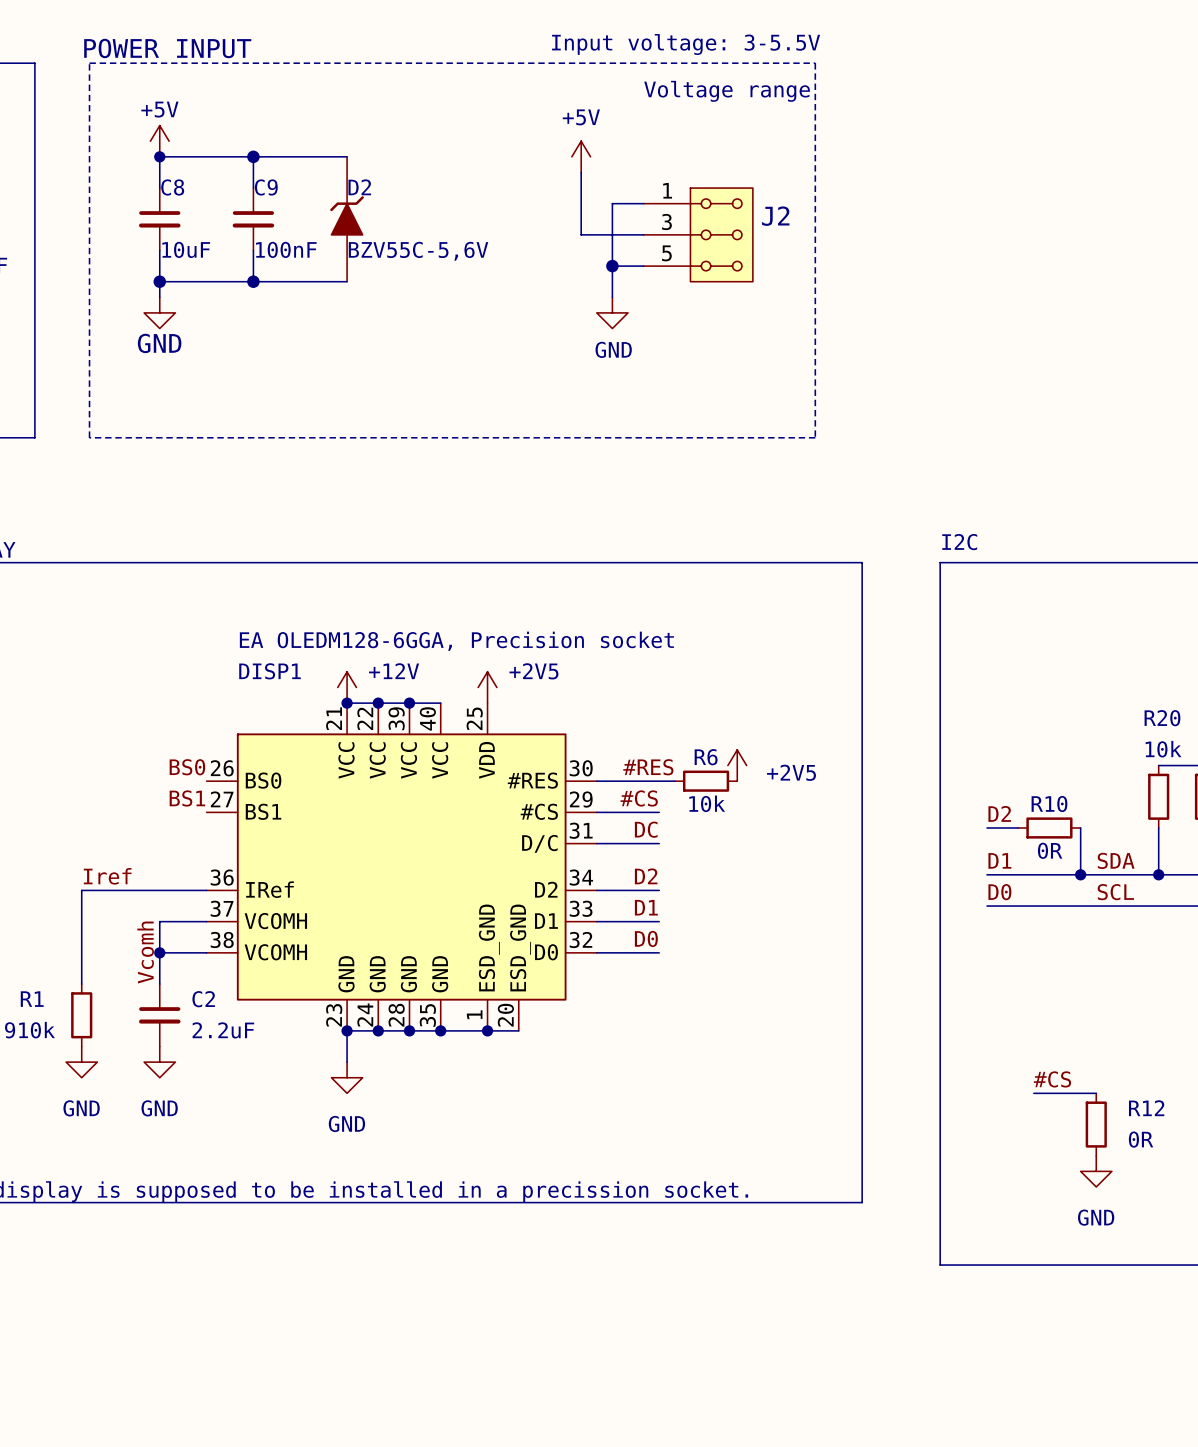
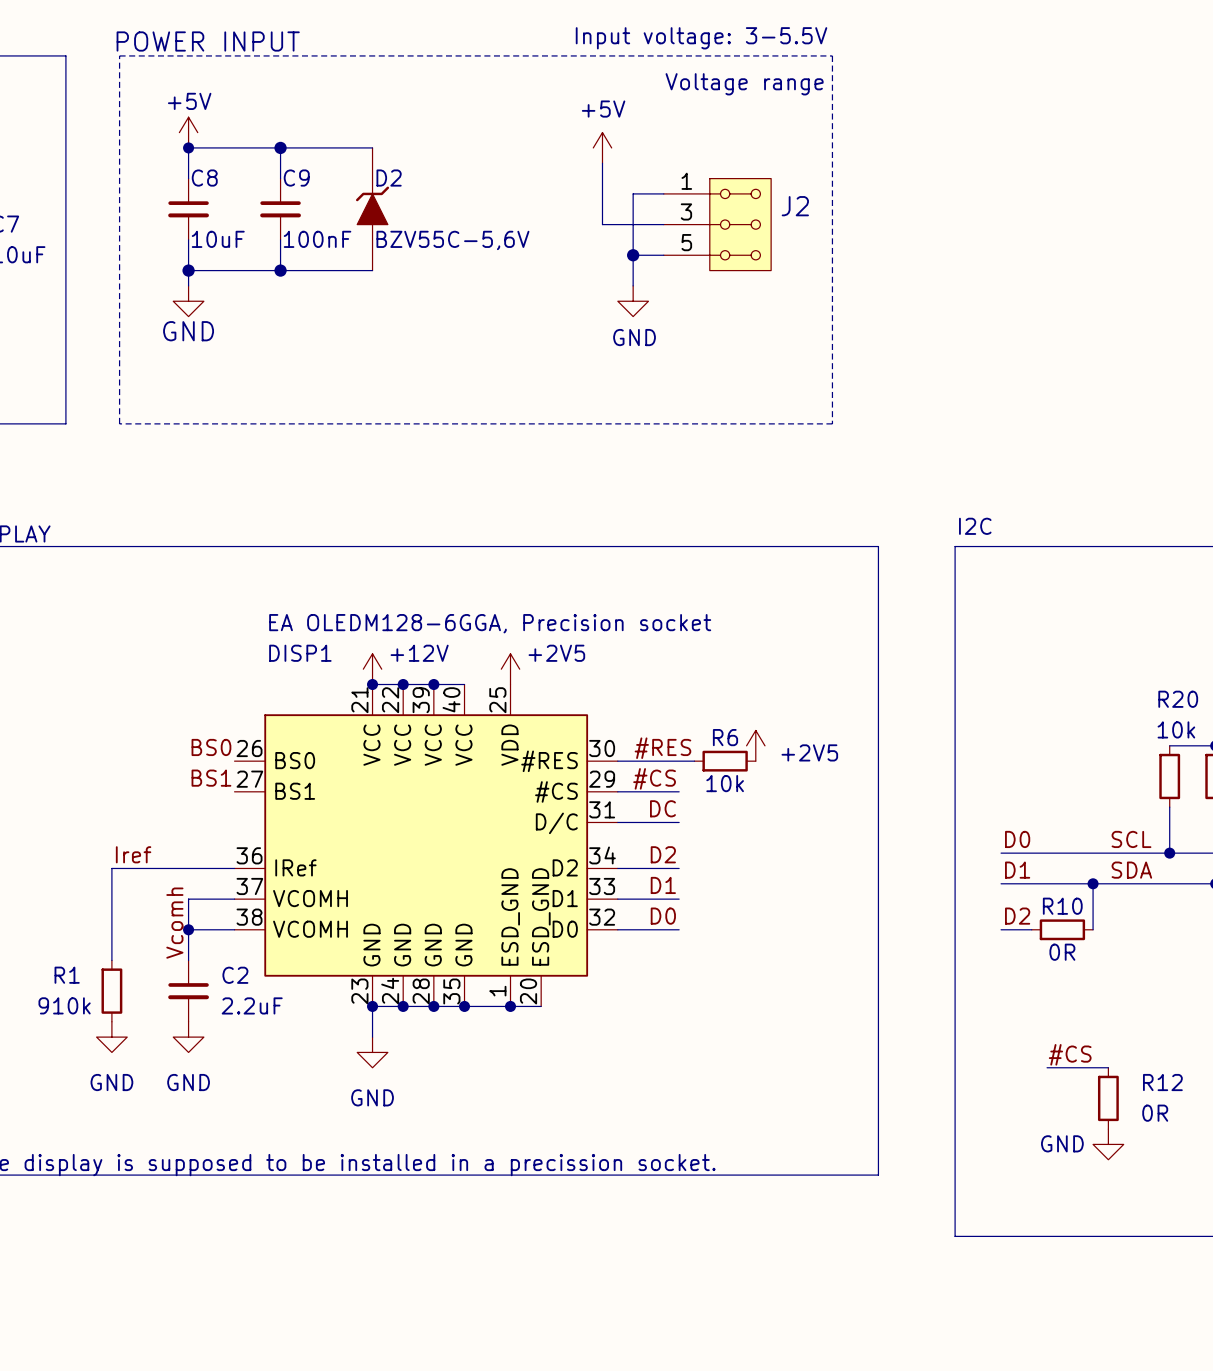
label position: D2 (999, 813) -> D2 (1017, 916)
wire: (987, 827) (1018, 827) -> (1001, 929) (1031, 929)
R10 position: (1049, 827) -> (1062, 929)
wire: (1080, 827) (1080, 874) -> (1093, 883) (1093, 929)
label: D1 (999, 860) -> D0 (1017, 839)
label: SDA (1116, 860) -> SCL (1131, 839)
junction position: (1080, 874) -> (1093, 883)
label: D0 (999, 892) -> D1 (1017, 870)
label: SCL (1115, 892) -> SDA (1131, 870)
power symbol text position: GND (1096, 1217) -> GND (1062, 1143)

